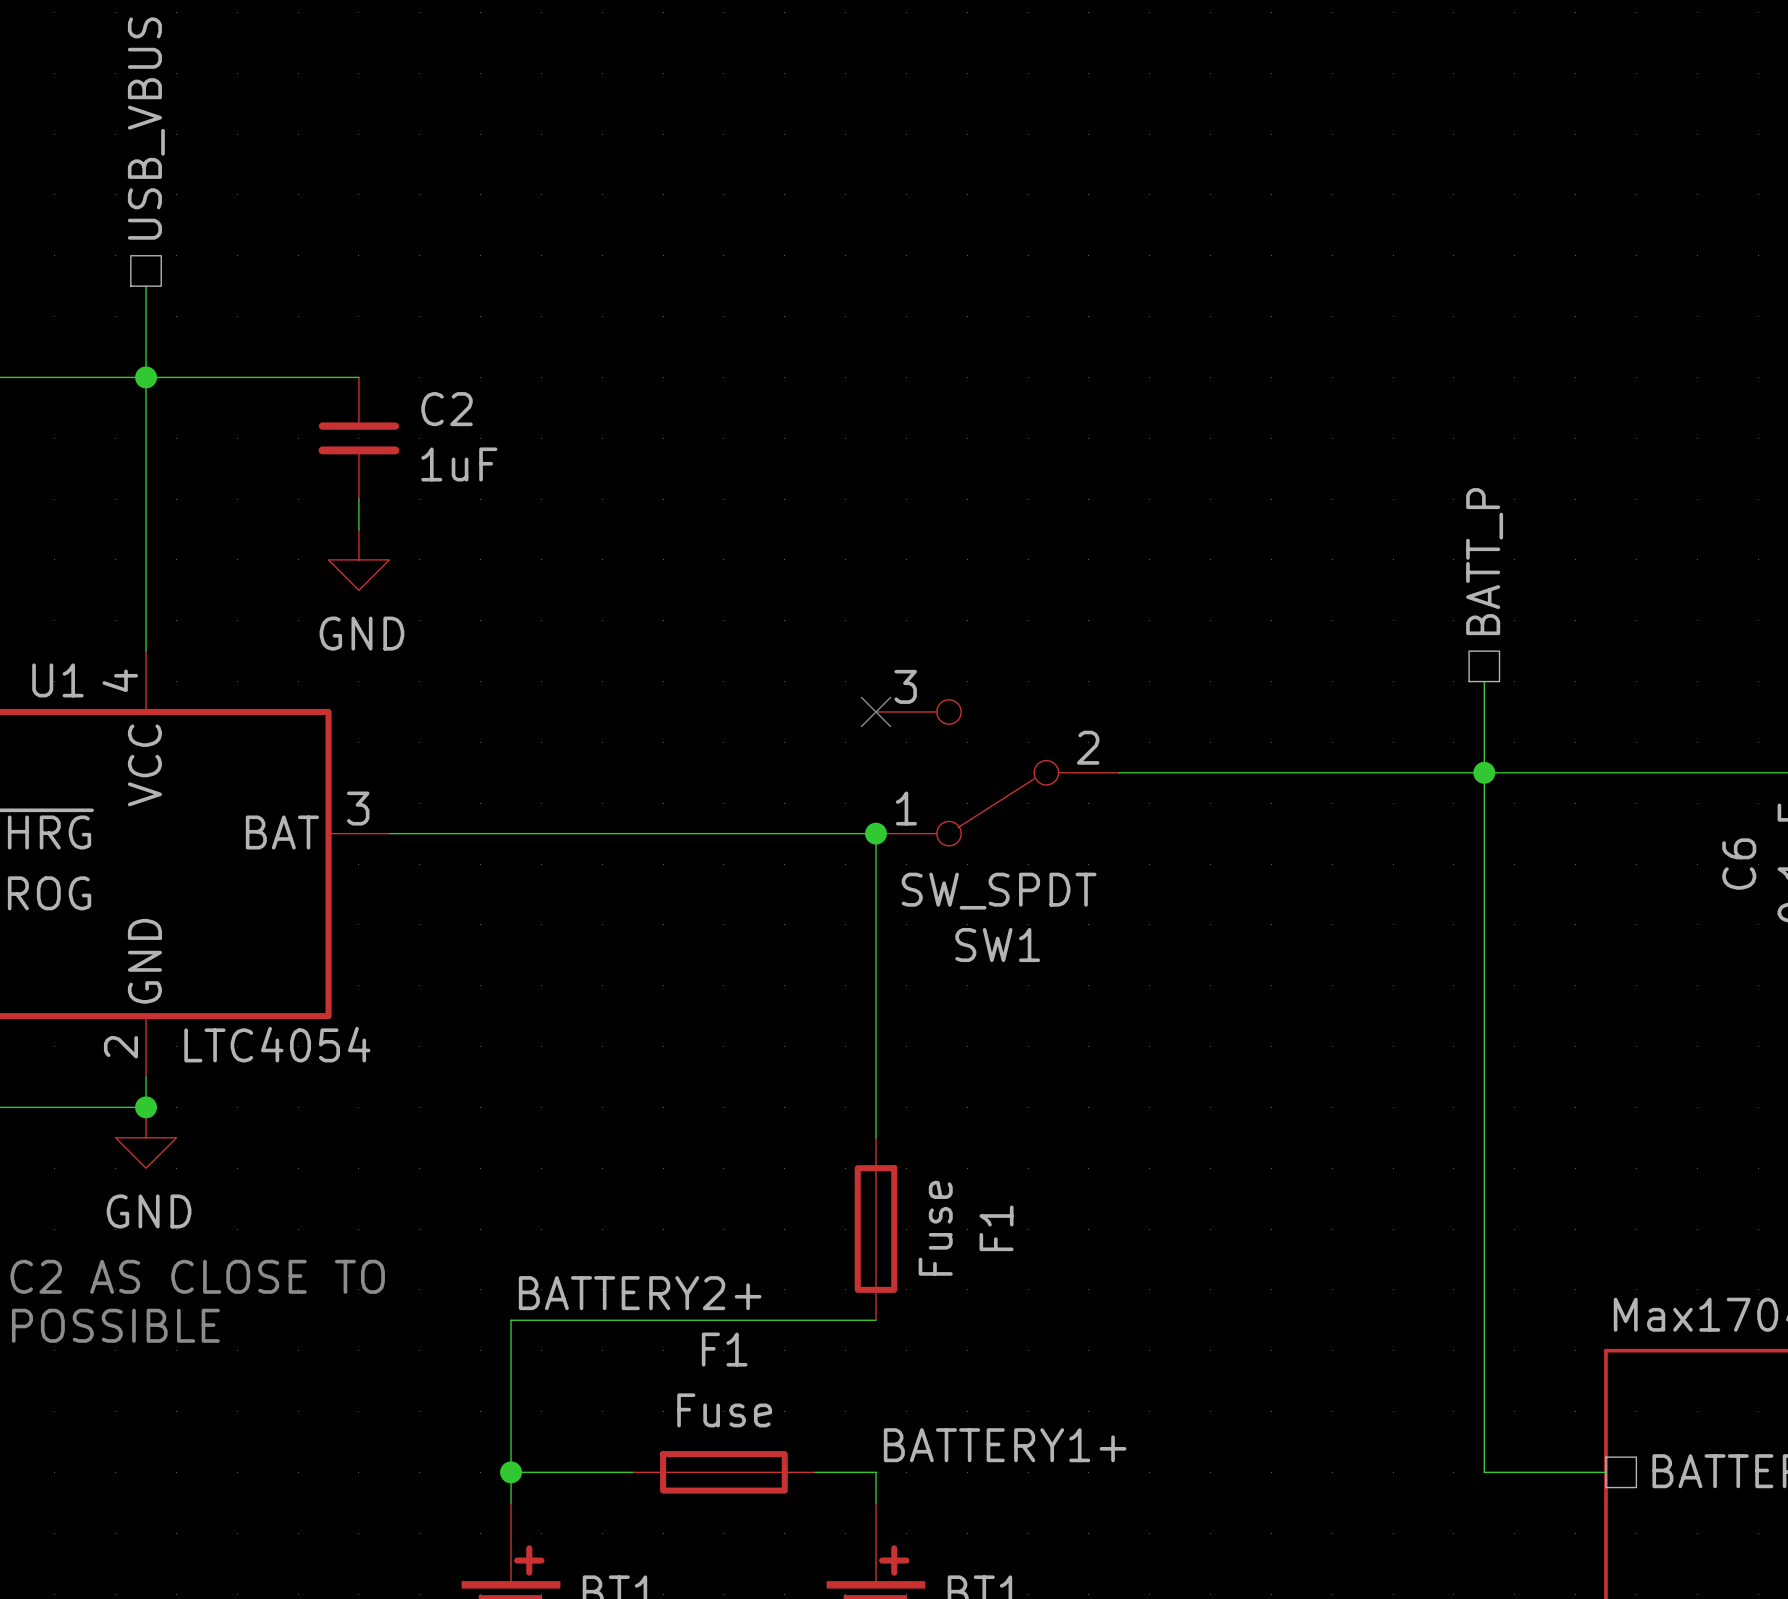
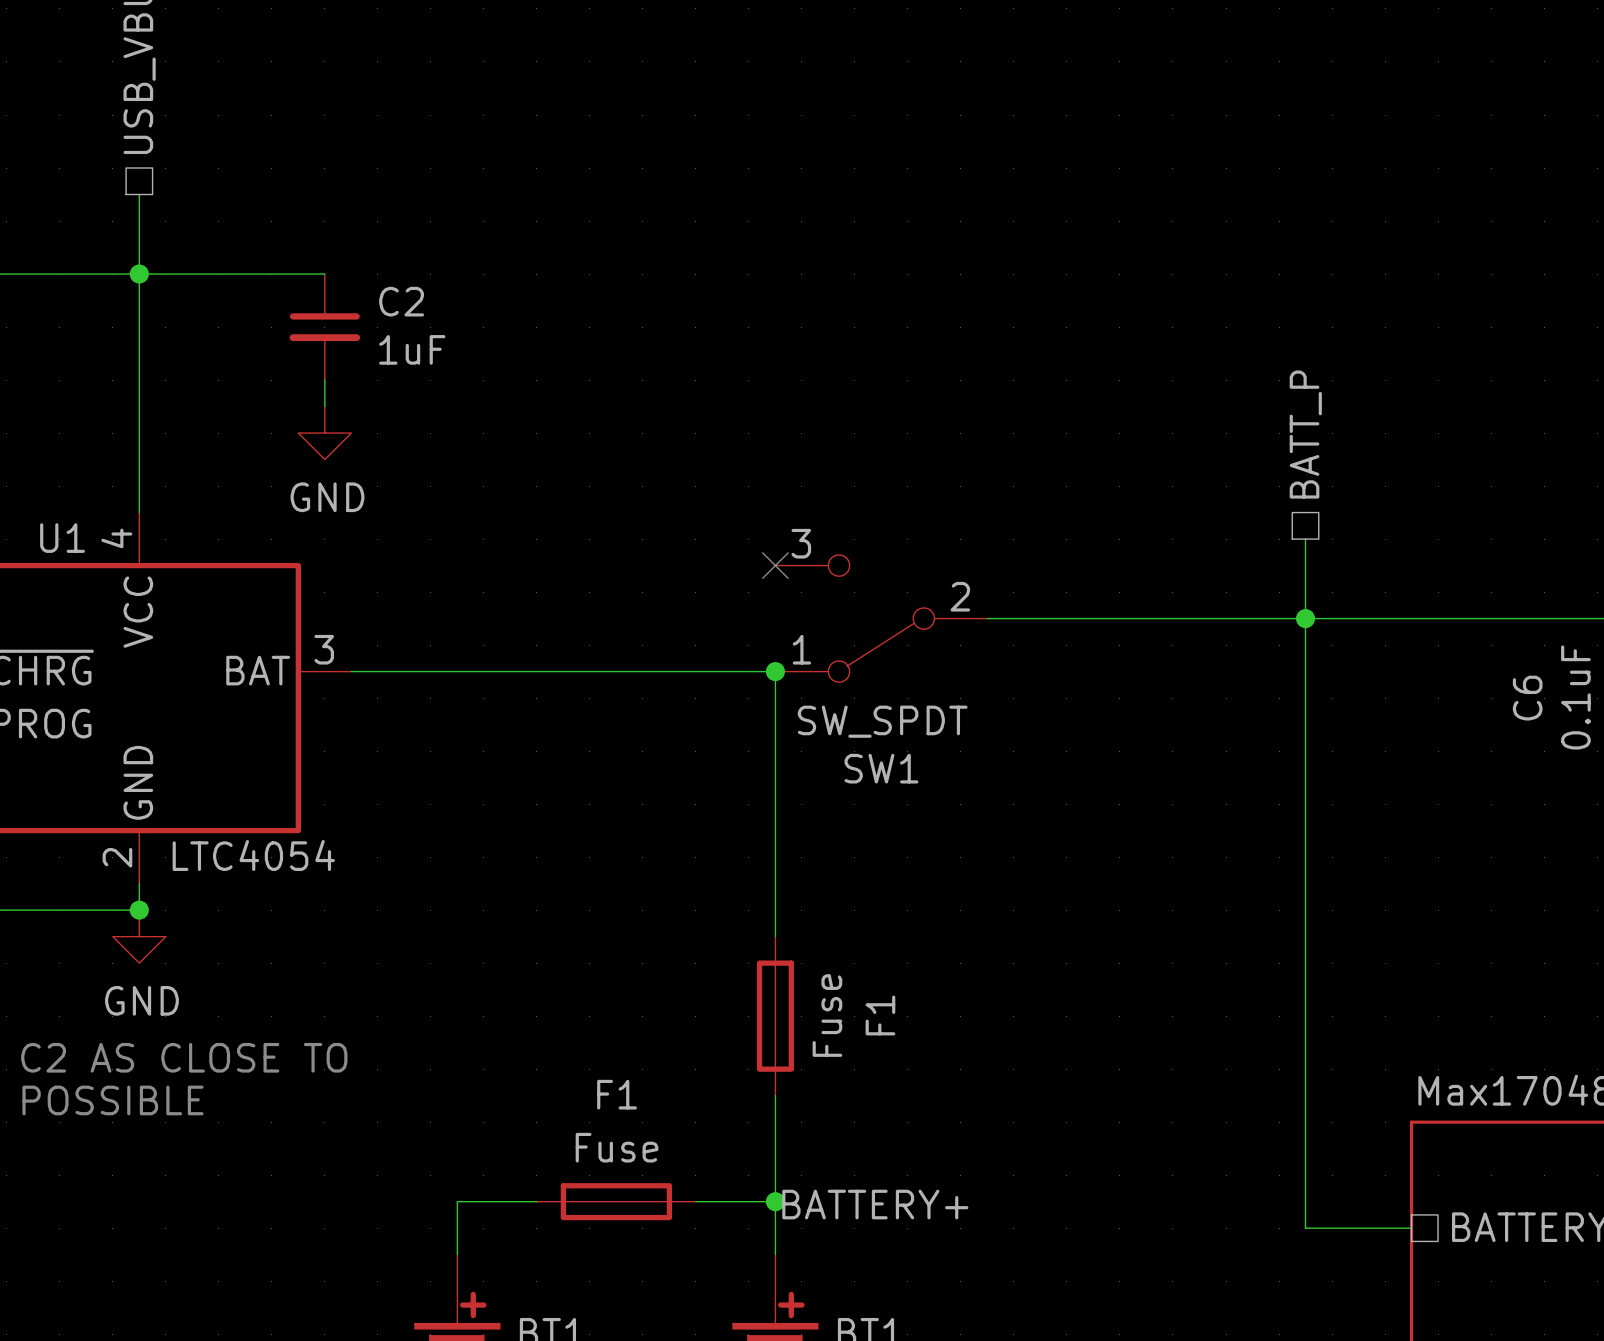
label: BATTERY2+ (640, 1293) -> none
wire: (876, 1320) (511, 1320) (511, 1441) -> (536, 1201) (457, 1201)
wire: none -> (695, 1201) (775, 1201)
junction: none -> (775, 1201)
label: BATTERY1+ (1005, 1445) -> BATTERY+ (875, 1204)
wire: (511, 1472) (632, 1472) -> none
junction: (511, 1472) -> none
F1 position: (723, 1472) -> (616, 1201)
wire: (815, 1472) (876, 1472) -> (775, 1095) (775, 1228)

